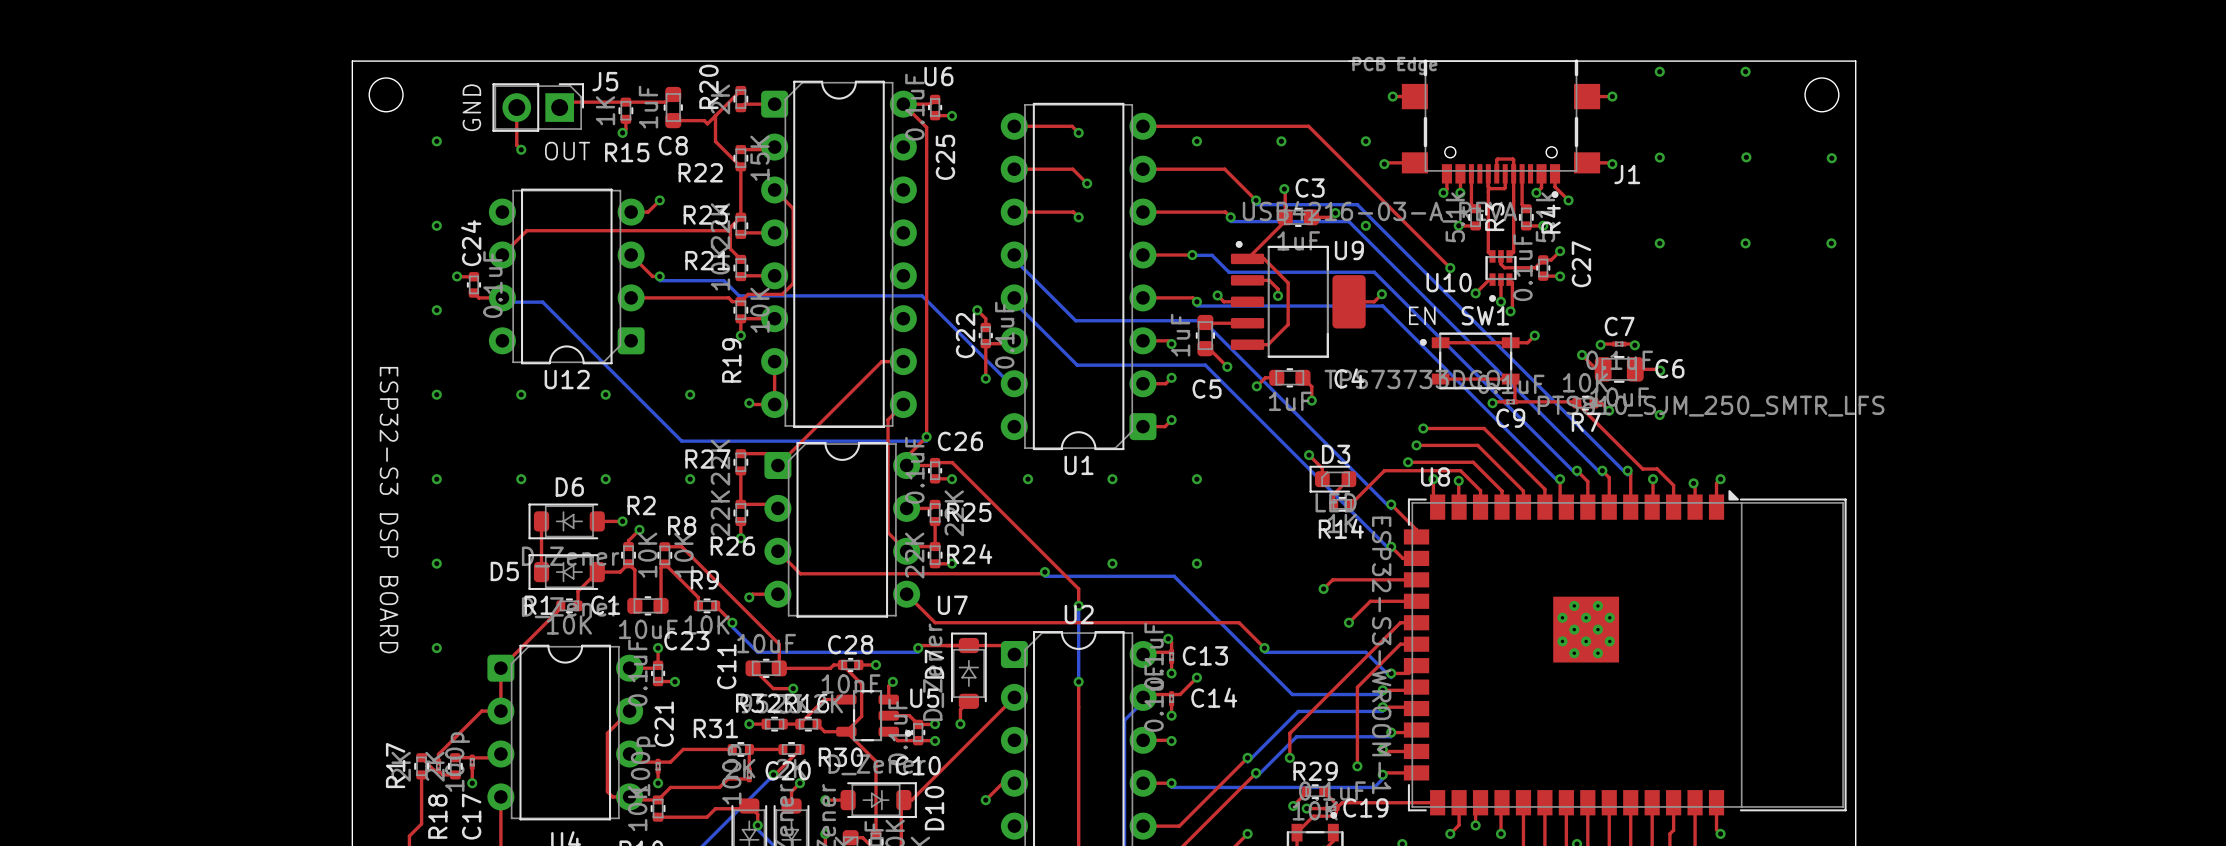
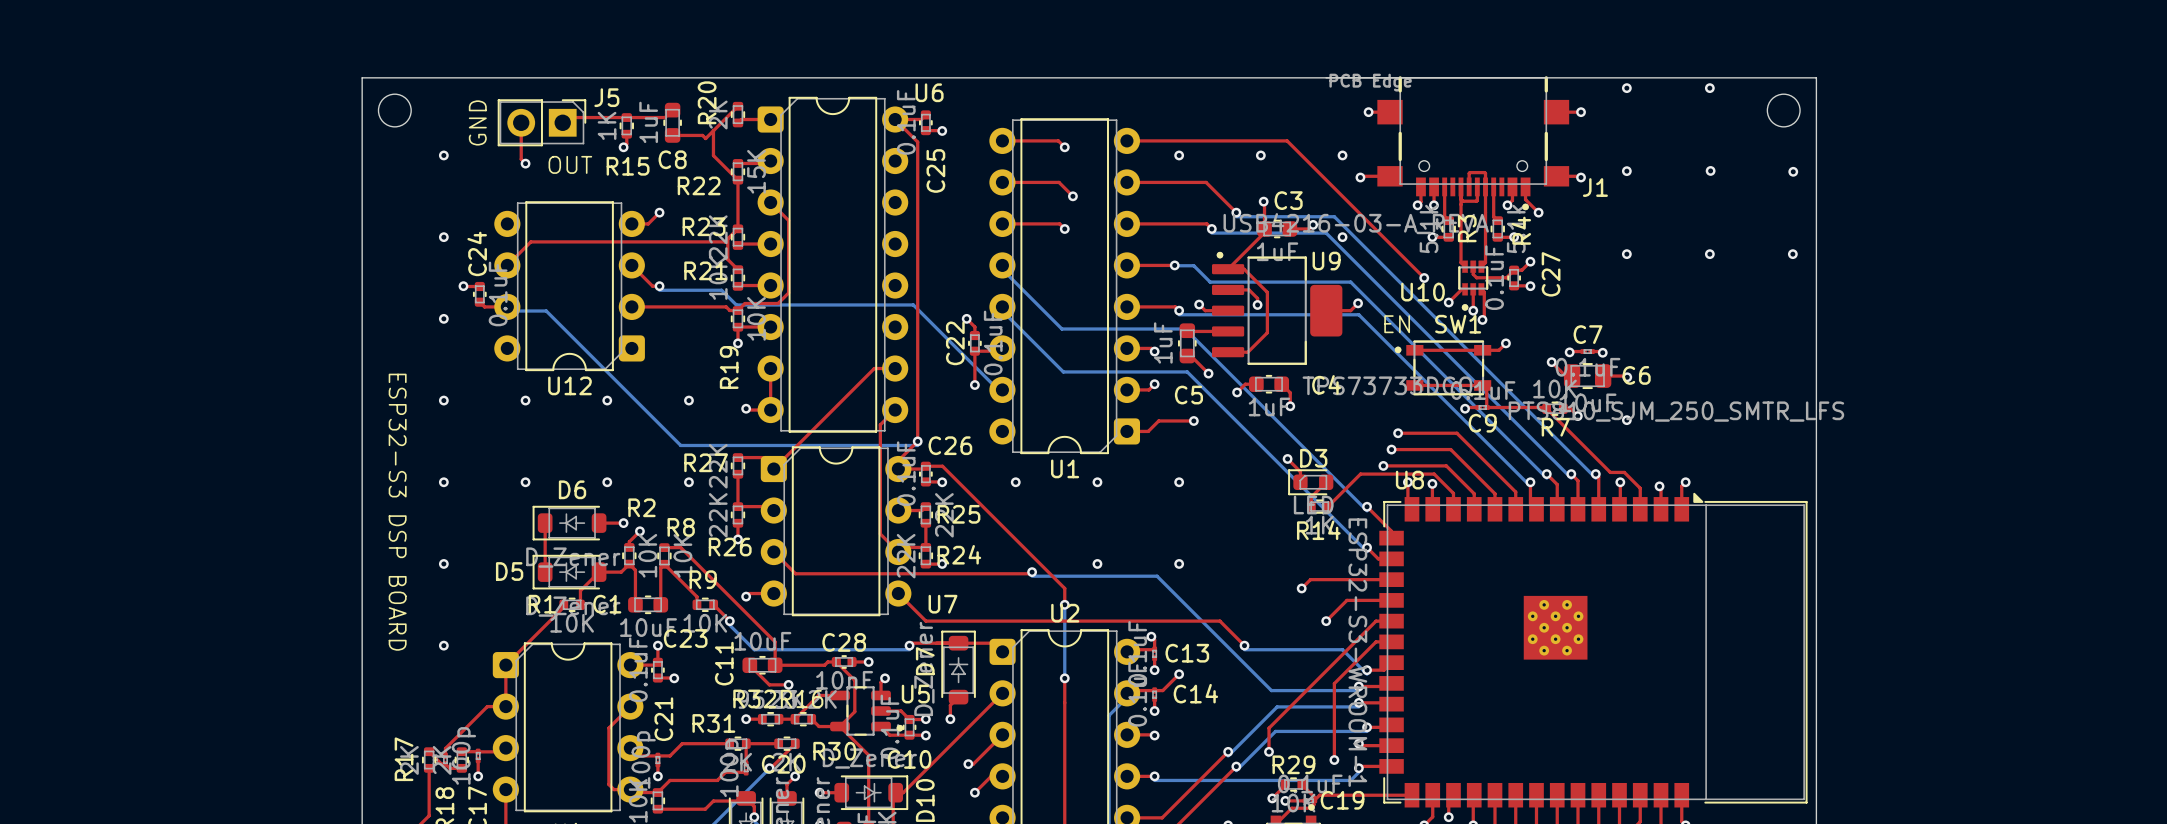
top track: none -> (1193, 420) (1158, 420) (1154, 425)
via position: (1171, 420) -> (1193, 420)
top track: none -> (1002, 734) (973, 764) (968, 764)
via: none -> (968, 764)

